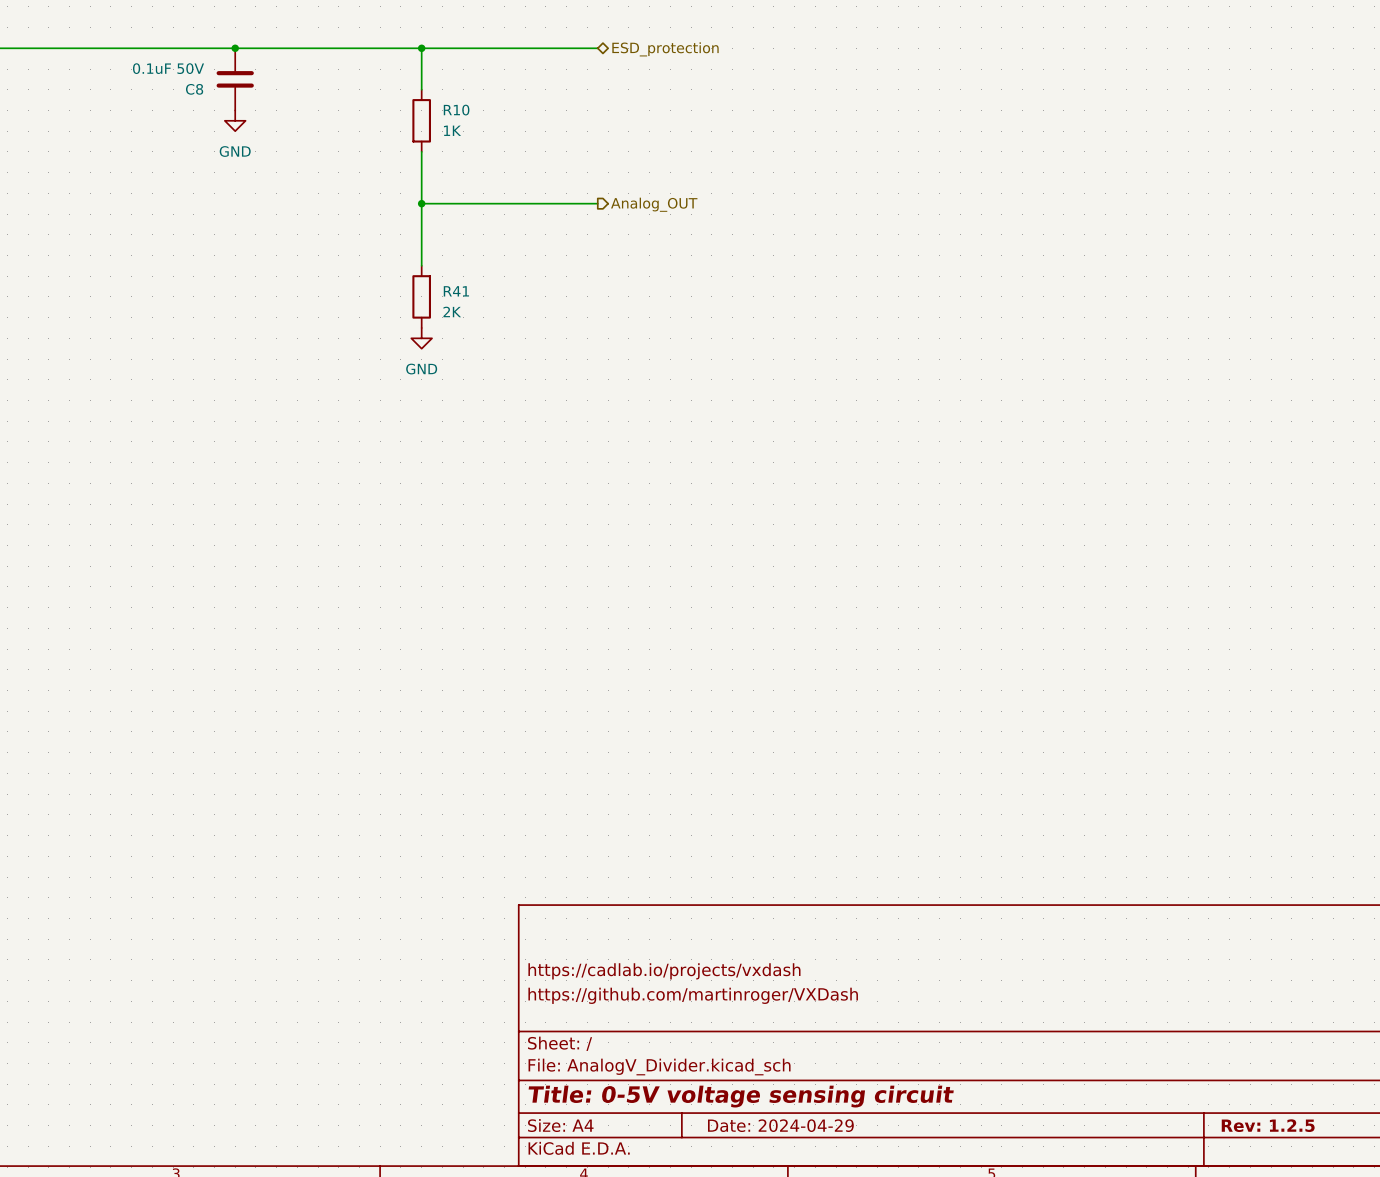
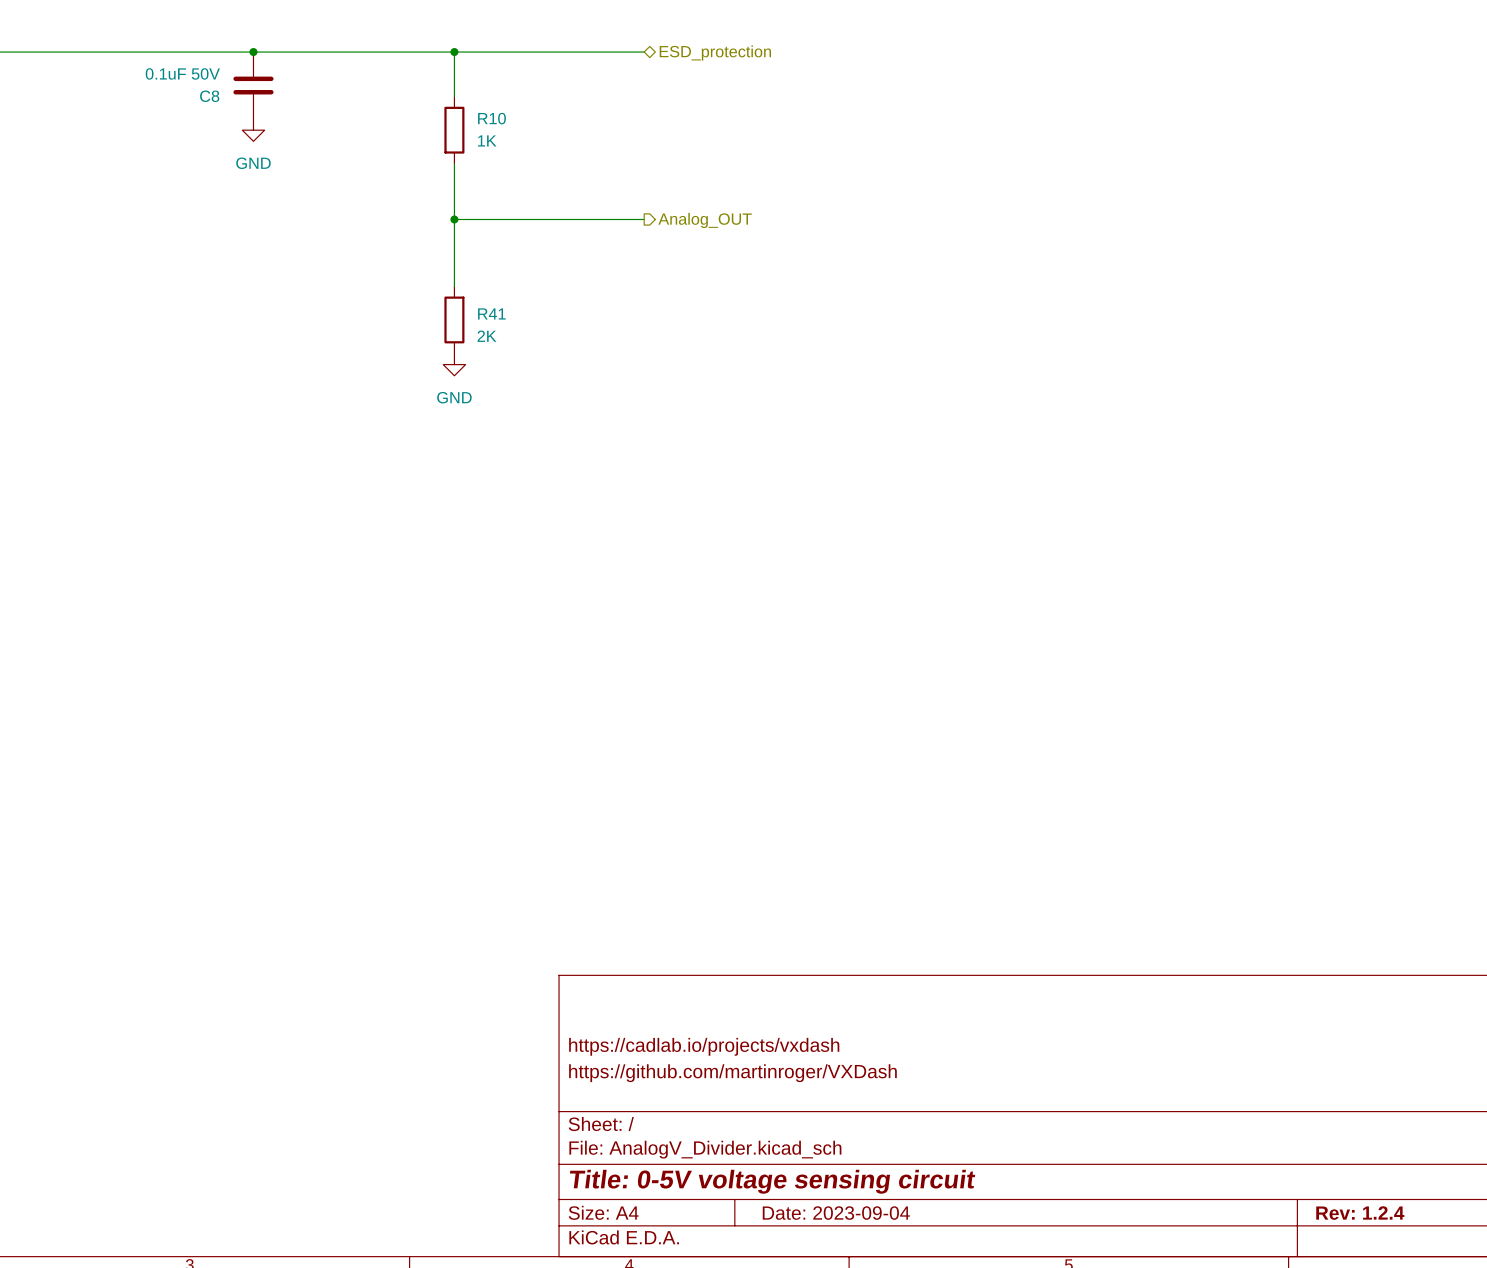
title block: Date: 2024-04-29 (780, 1125) -> Date: 2023-09-04 (836, 1213)
title block: Rev: 1.2.5 (1268, 1125) -> Rev: 1.2.4 (1360, 1213)

